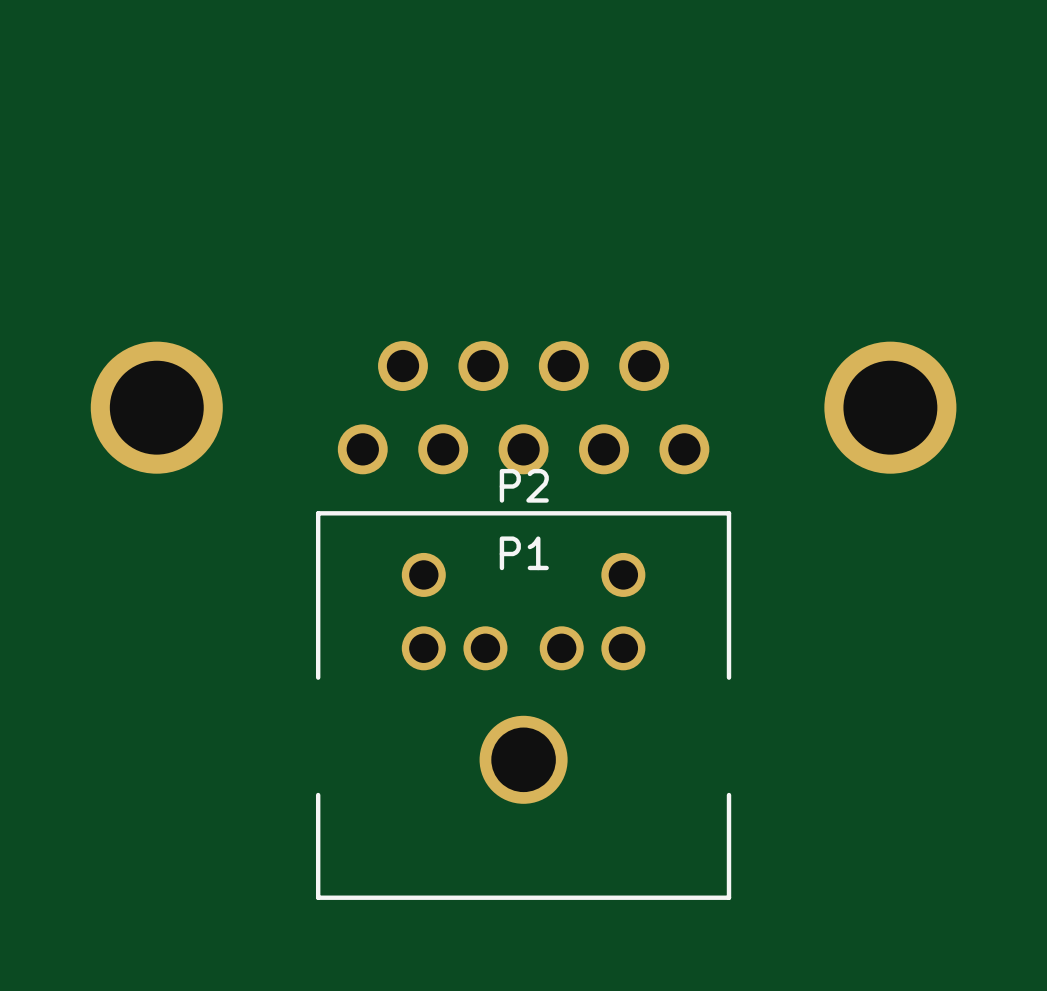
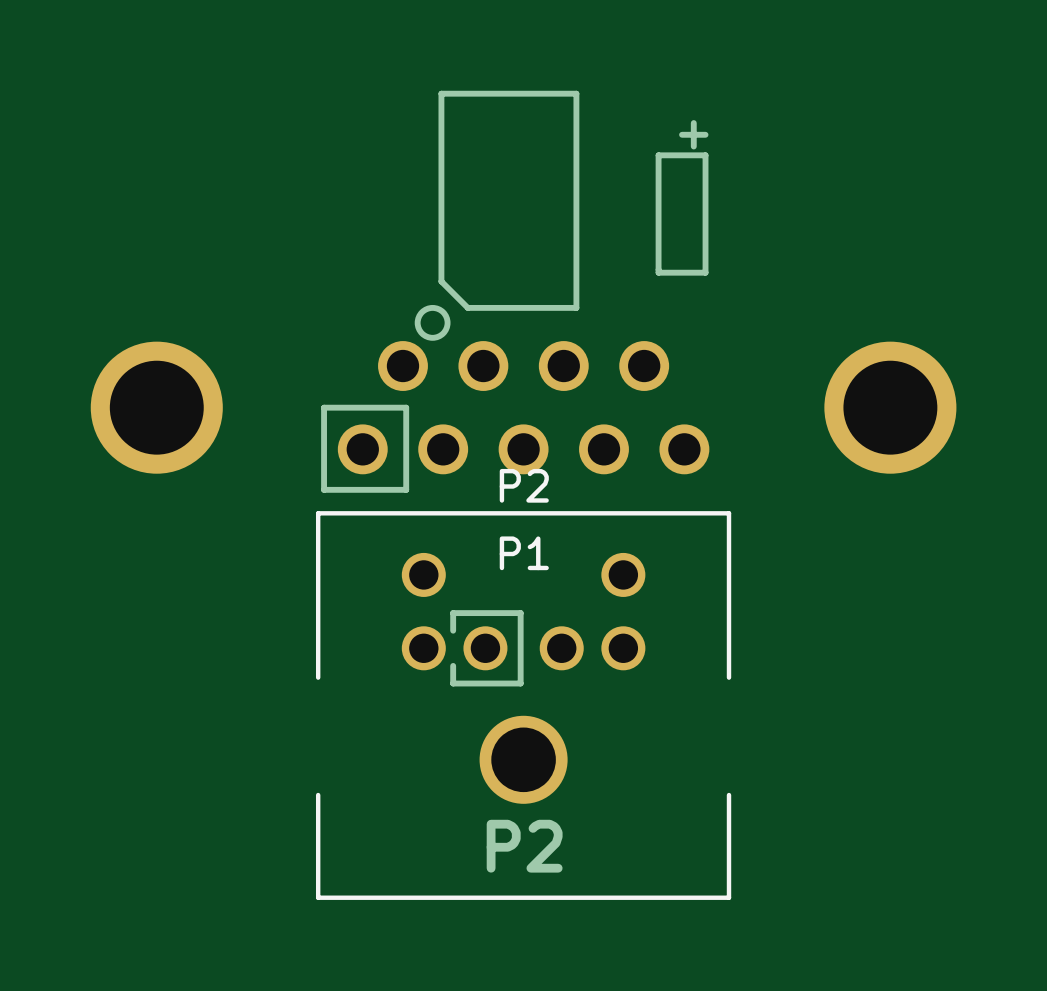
line: none -> (441, 93) (576, 93) (576, 307) (467, 307) (441, 281) (441, 93)
line: none -> (693, 123) (693, 146)
line: none -> (682, 134) (705, 134)
line: none -> (658, 155) (705, 155) (705, 272) (658, 272) (658, 155)
drawing: none -> [414, 304, 451, 341]
line: none -> (324, 407) (324, 489) (406, 489) (406, 407) (324, 407)
line: none -> (453, 630) (453, 613) (520, 613) (520, 683) (453, 683) (453, 665)
text: none -> P2 (524, 846)

